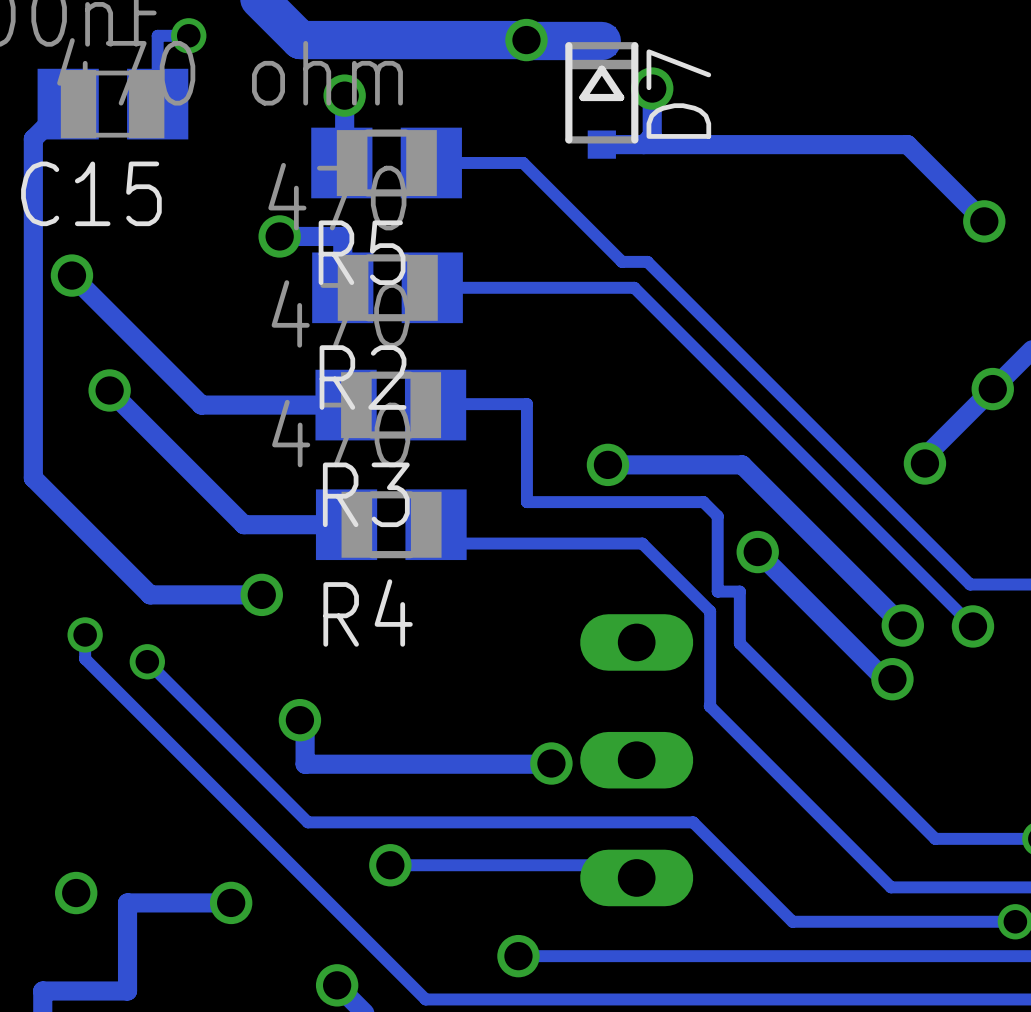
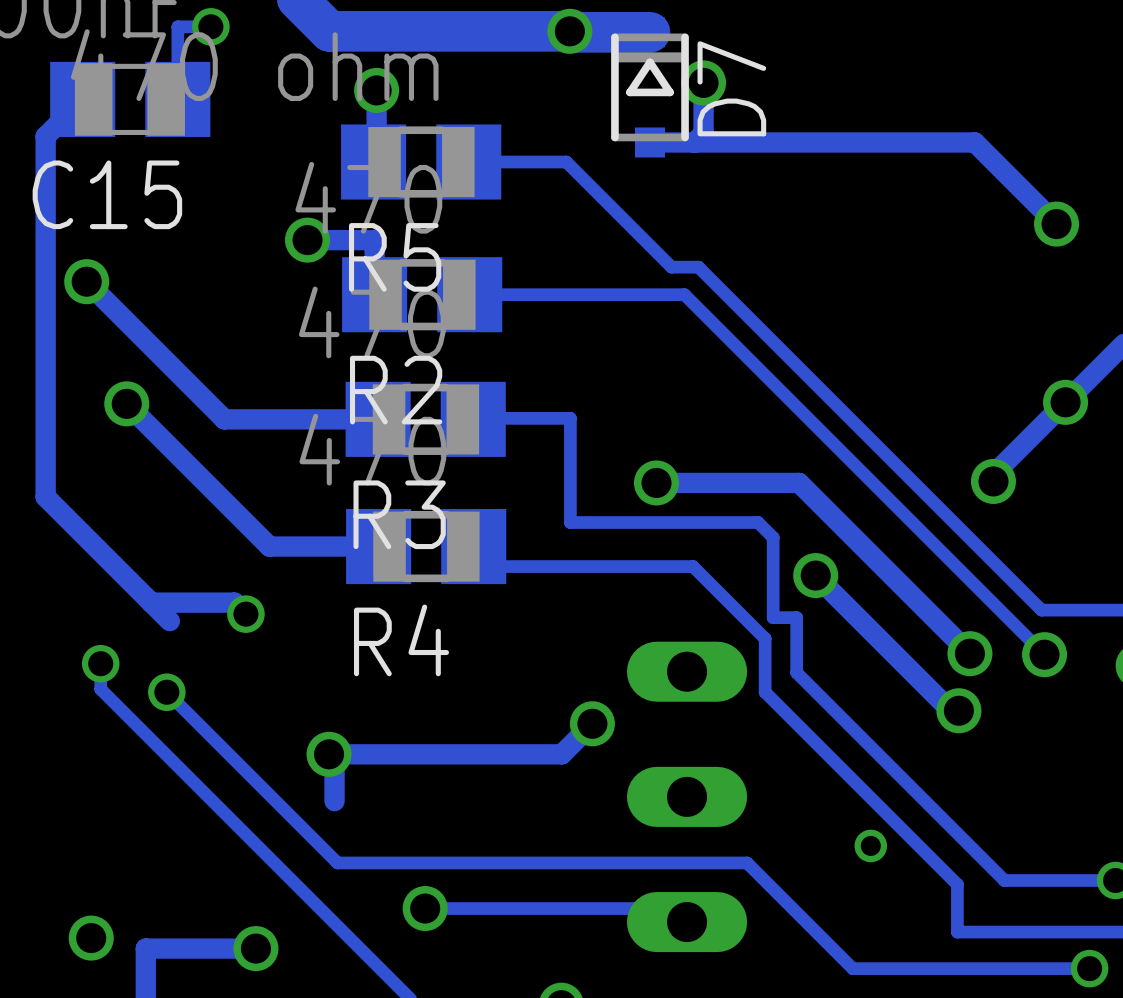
track: none -> (151, 602) (234, 602) (245, 614)
via: none -> (245, 614)
track: (261, 594) (150, 594) -> none
via: (261, 594) -> none
track: (710, 661) (710, 706) -> none
track: none -> (592, 723) (561, 754) (329, 754)
track: (709, 706) (891, 887) -> (765, 692) (957, 884) (957, 932)
track: (551, 763) (305, 764) -> none
via position: (551, 763) -> (592, 723)
via: none -> (870, 845)

